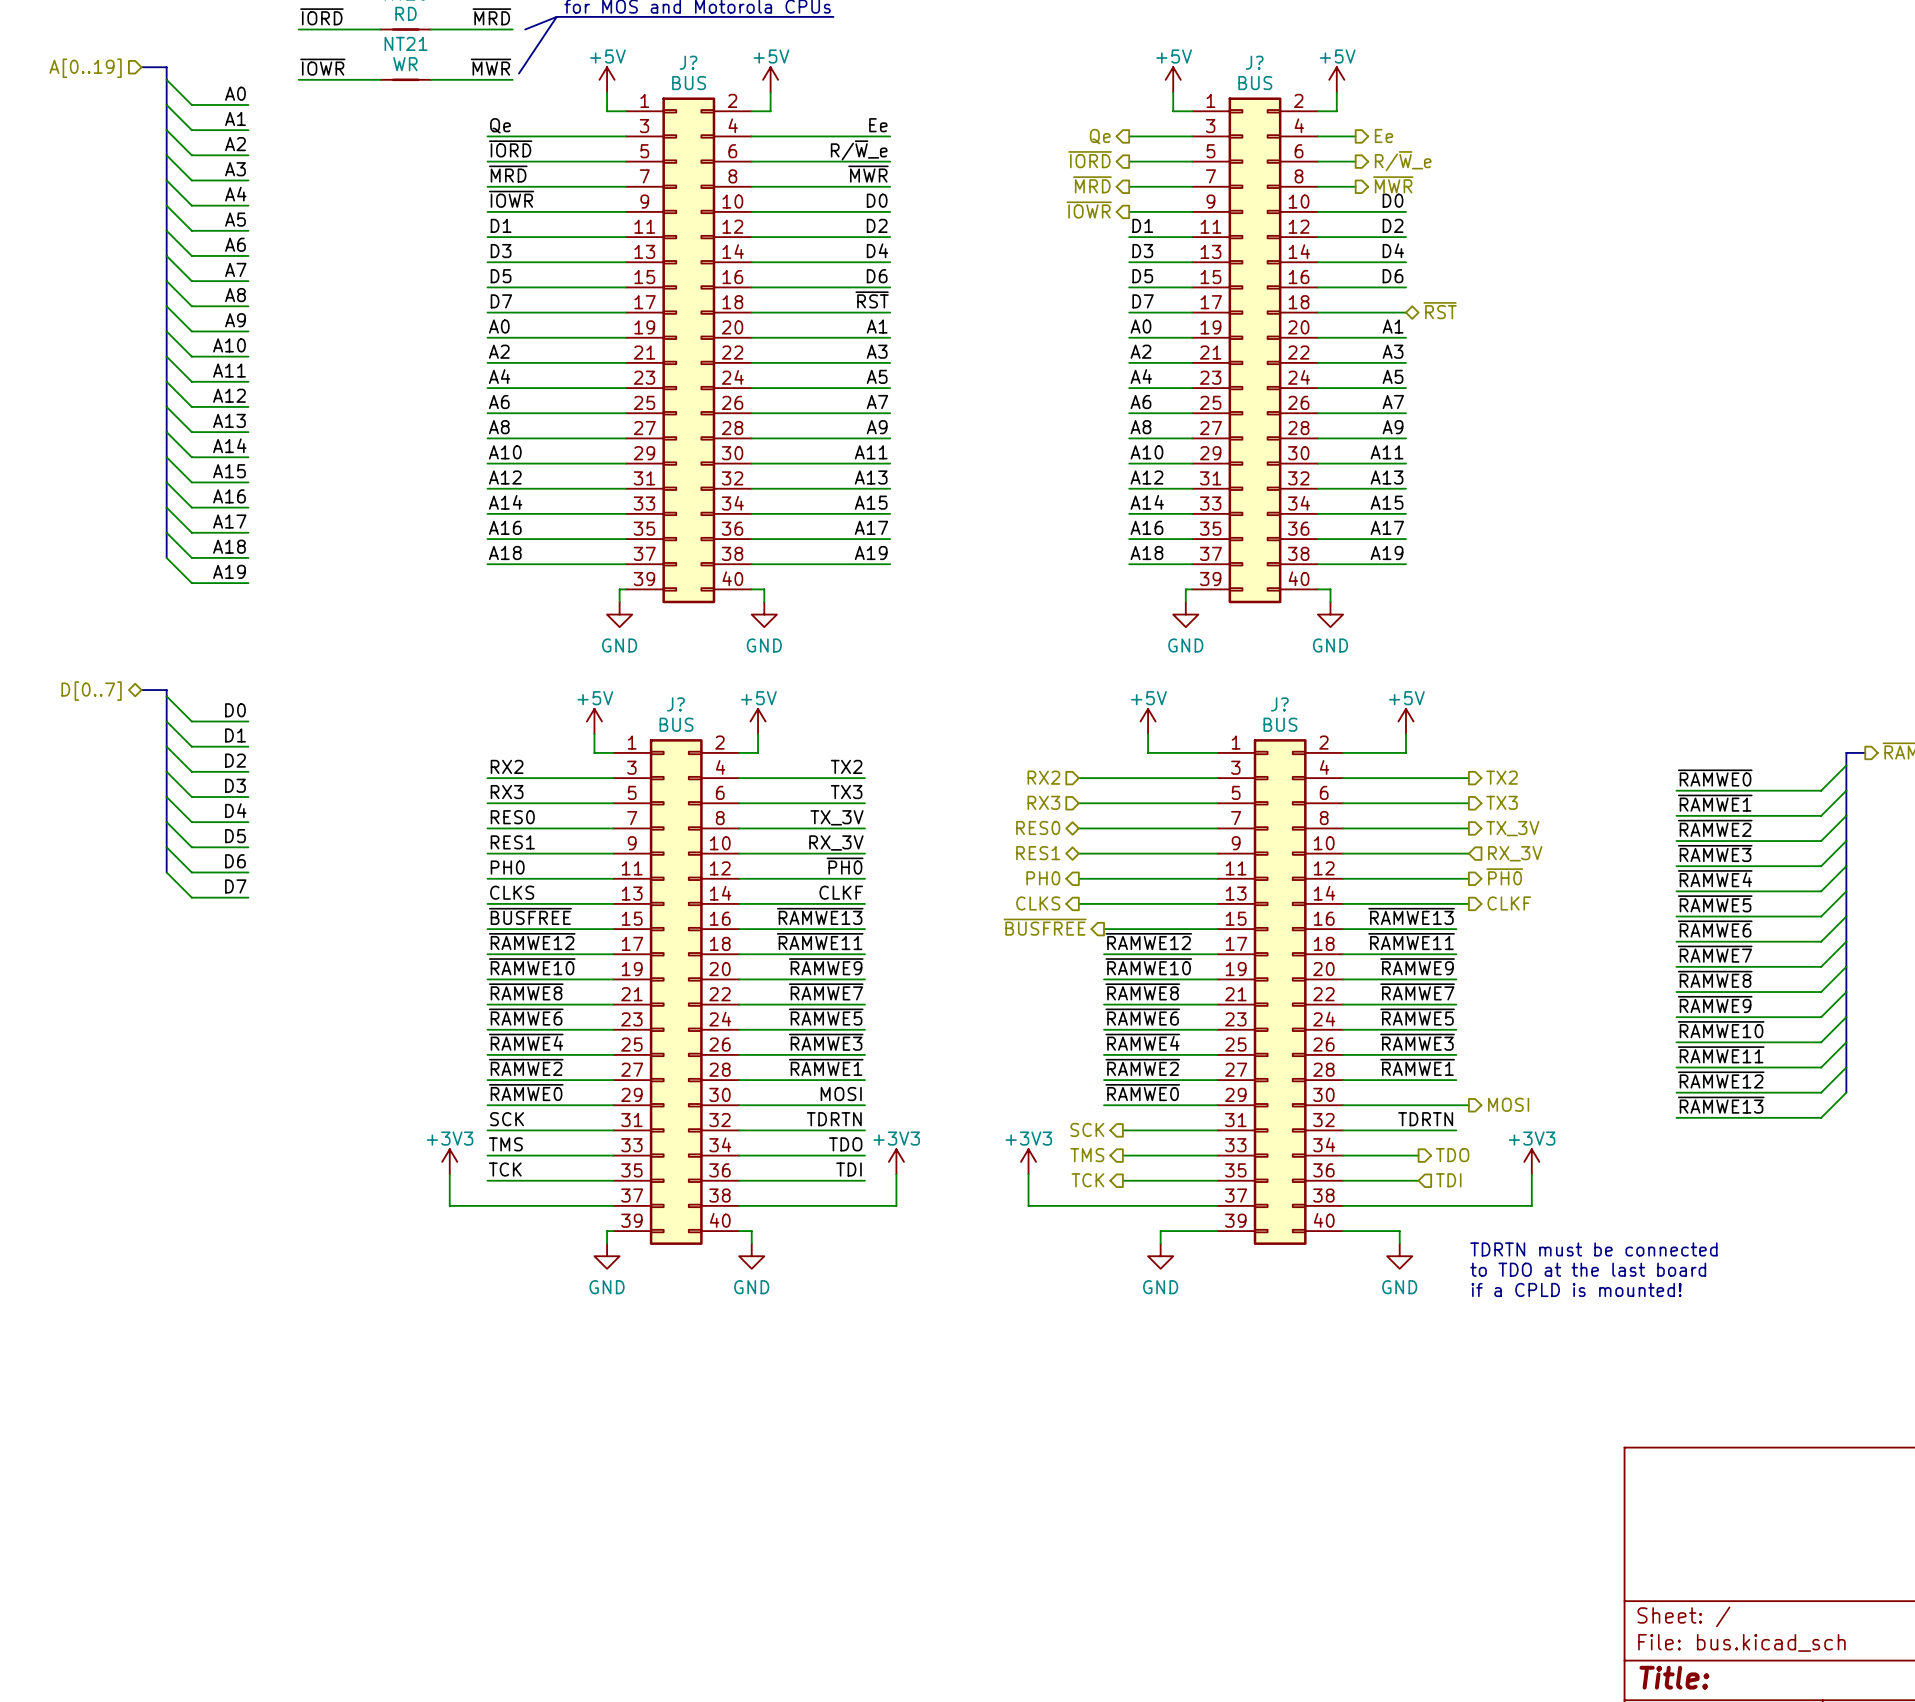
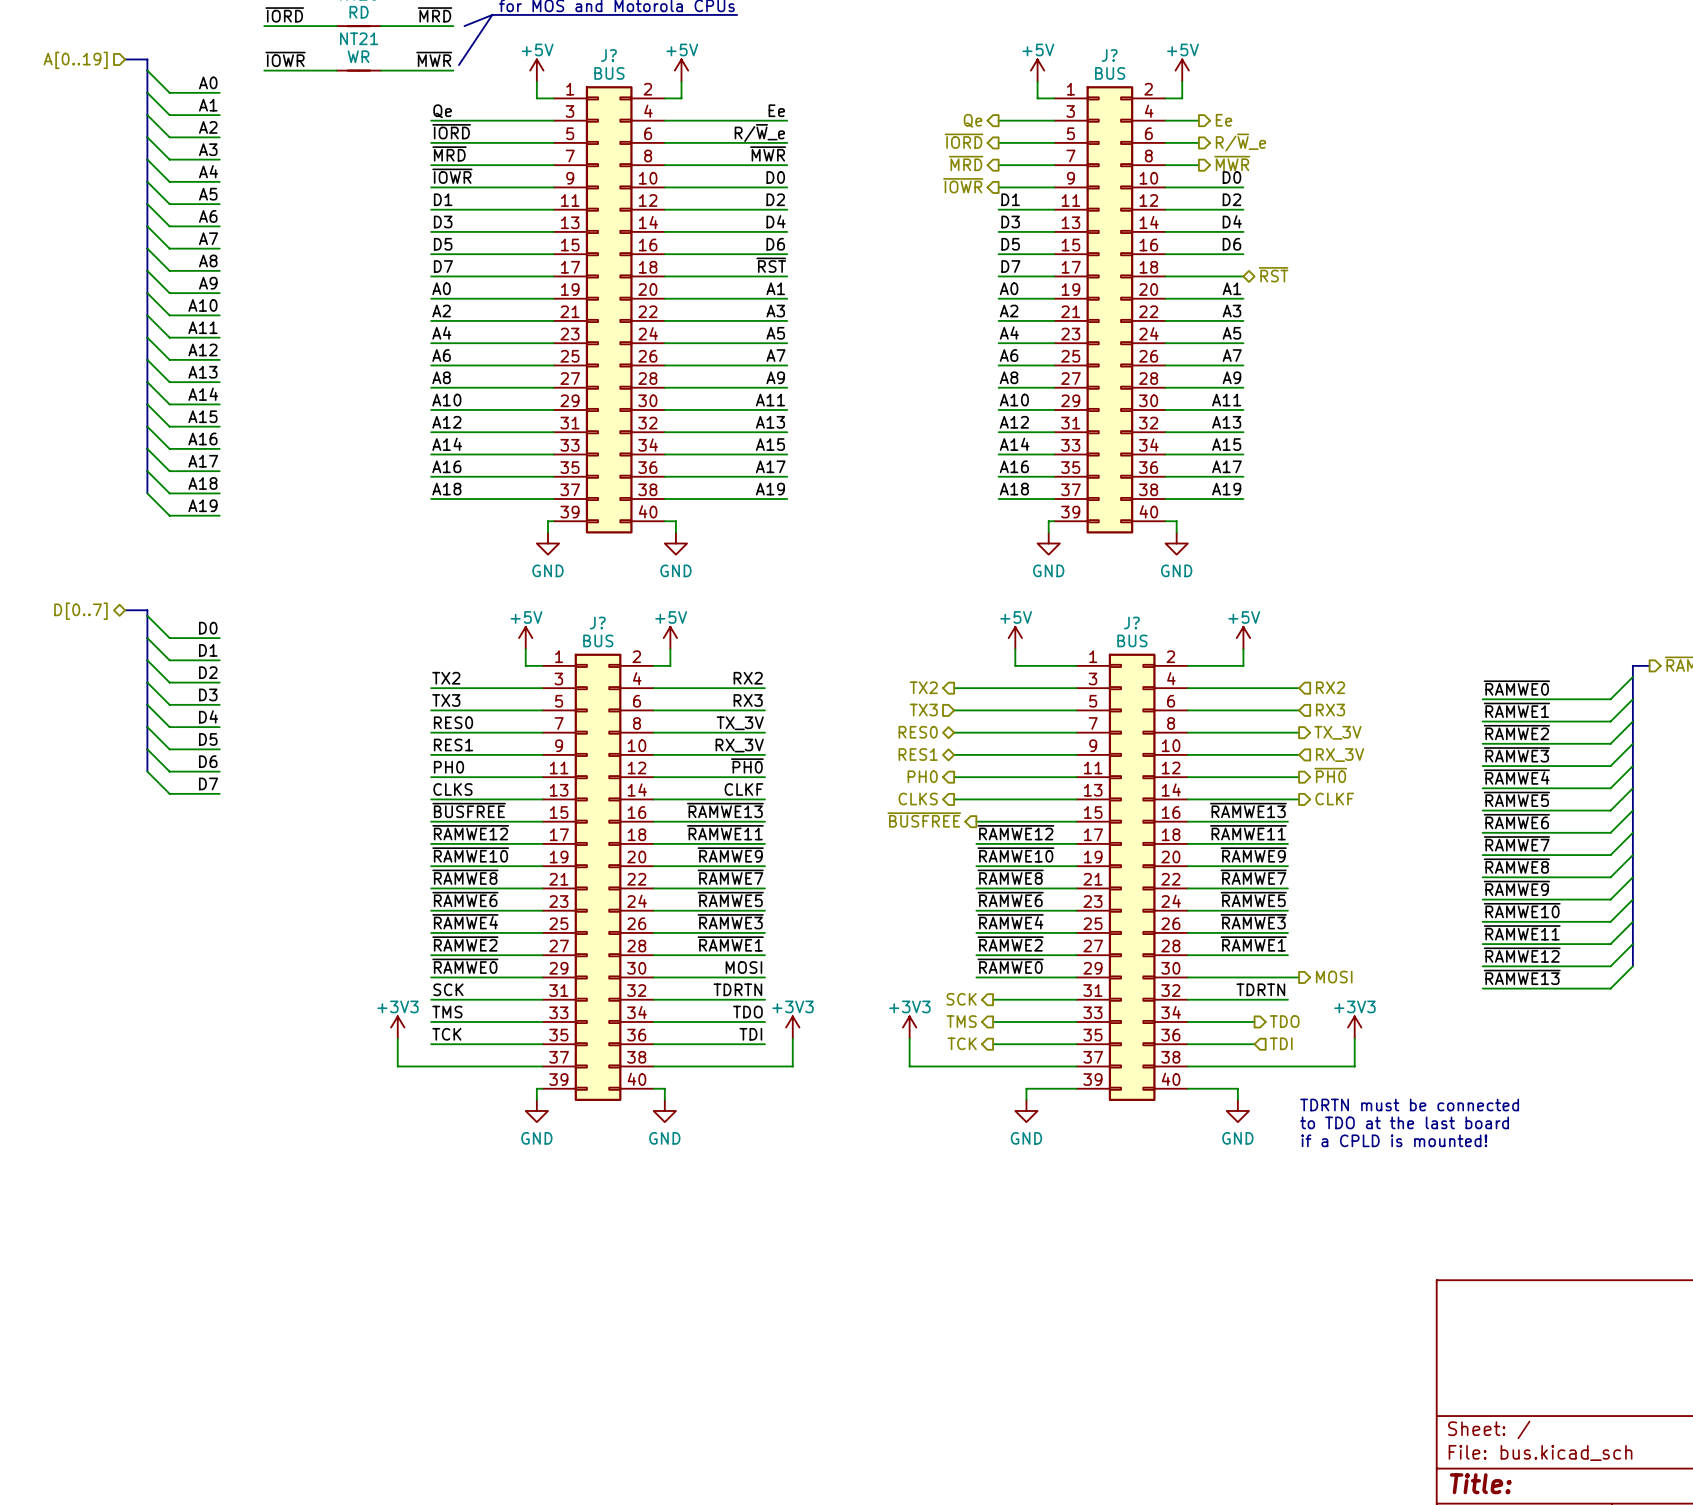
label: RX2 (507, 766) -> TX2 (446, 678)
label: TX2 (846, 766) -> RX2 (748, 678)
hierarchical label shape: input (1043, 777) -> output (923, 687)
hierarchical label: RX2 (1043, 777) -> TX2 (923, 687)
hierarchical label shape: output (1502, 777) -> input (1330, 687)
hierarchical label: TX2 (1502, 777) -> RX2 (1330, 687)
label: RX3 (507, 792) -> TX3 (446, 700)
label: TX3 (846, 792) -> RX3 (748, 700)
hierarchical label: RX3 (1043, 802) -> TX3 (923, 710)
hierarchical label shape: output (1502, 802) -> input (1330, 710)
hierarchical label: TX3 (1502, 802) -> RX3 (1330, 710)

